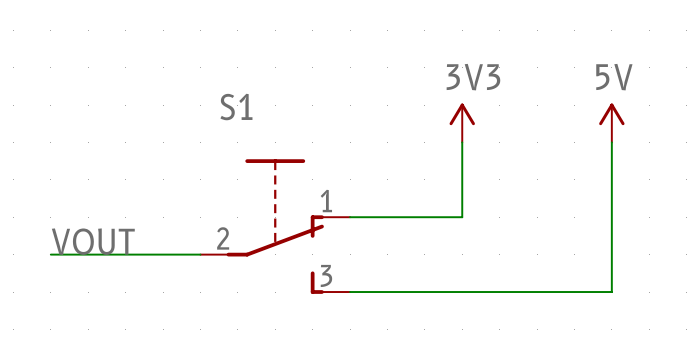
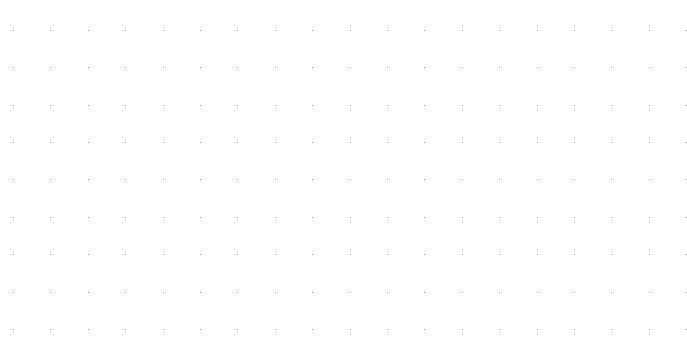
power symbol: 3V3 (462, 122) -> none
power symbol: 5V (611, 122) -> none
wire: (462, 142) (462, 217) (350, 217) -> none
wire: (611, 142) (611, 292) (350, 292) -> none
S1: (275, 226) -> none
label: VOUT (93, 241) -> none
wire: (50, 254) (200, 254) -> none

